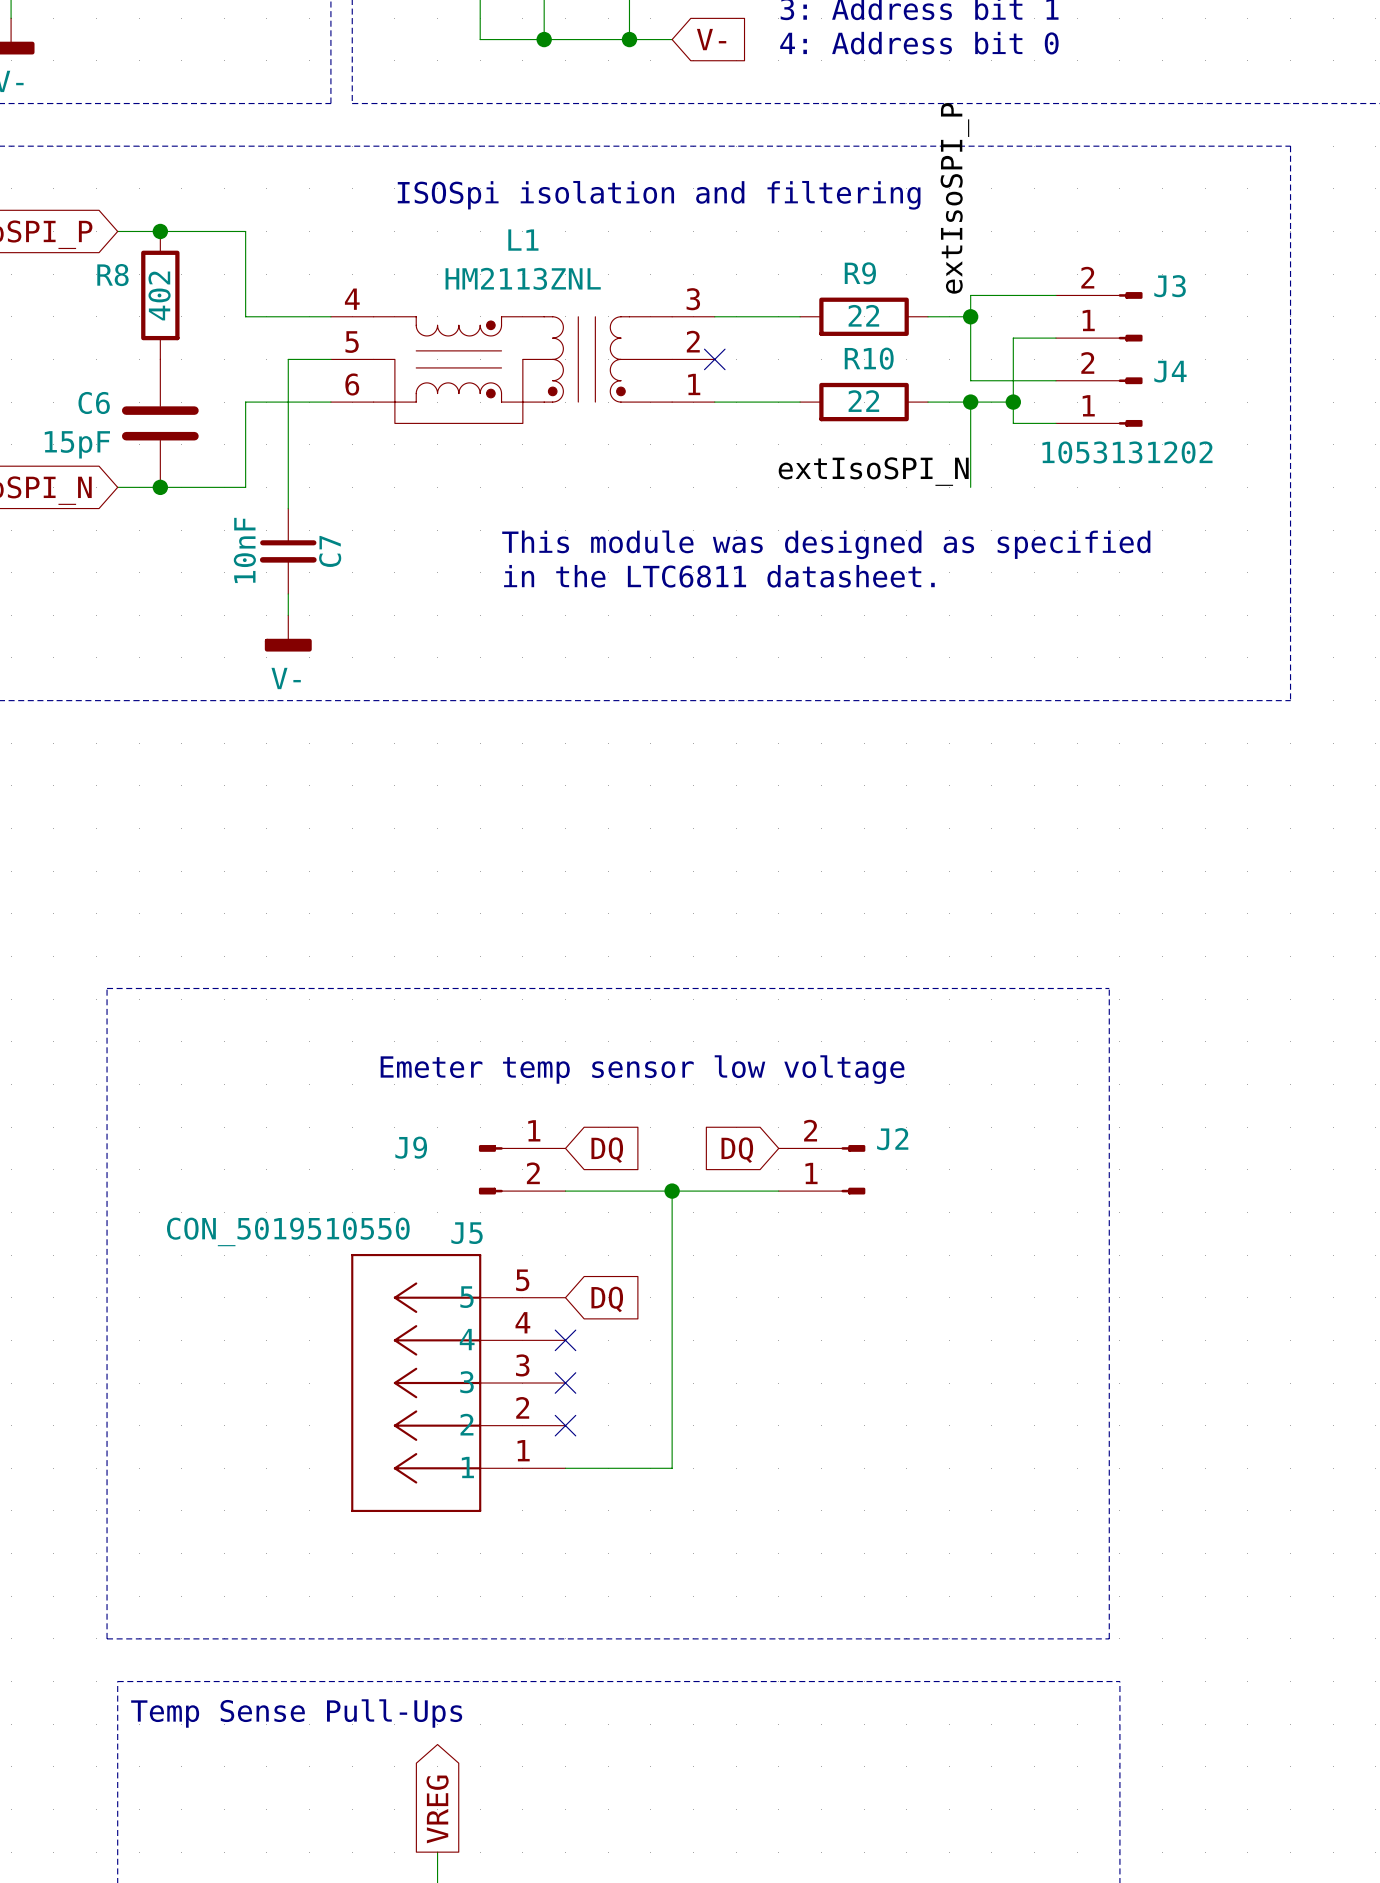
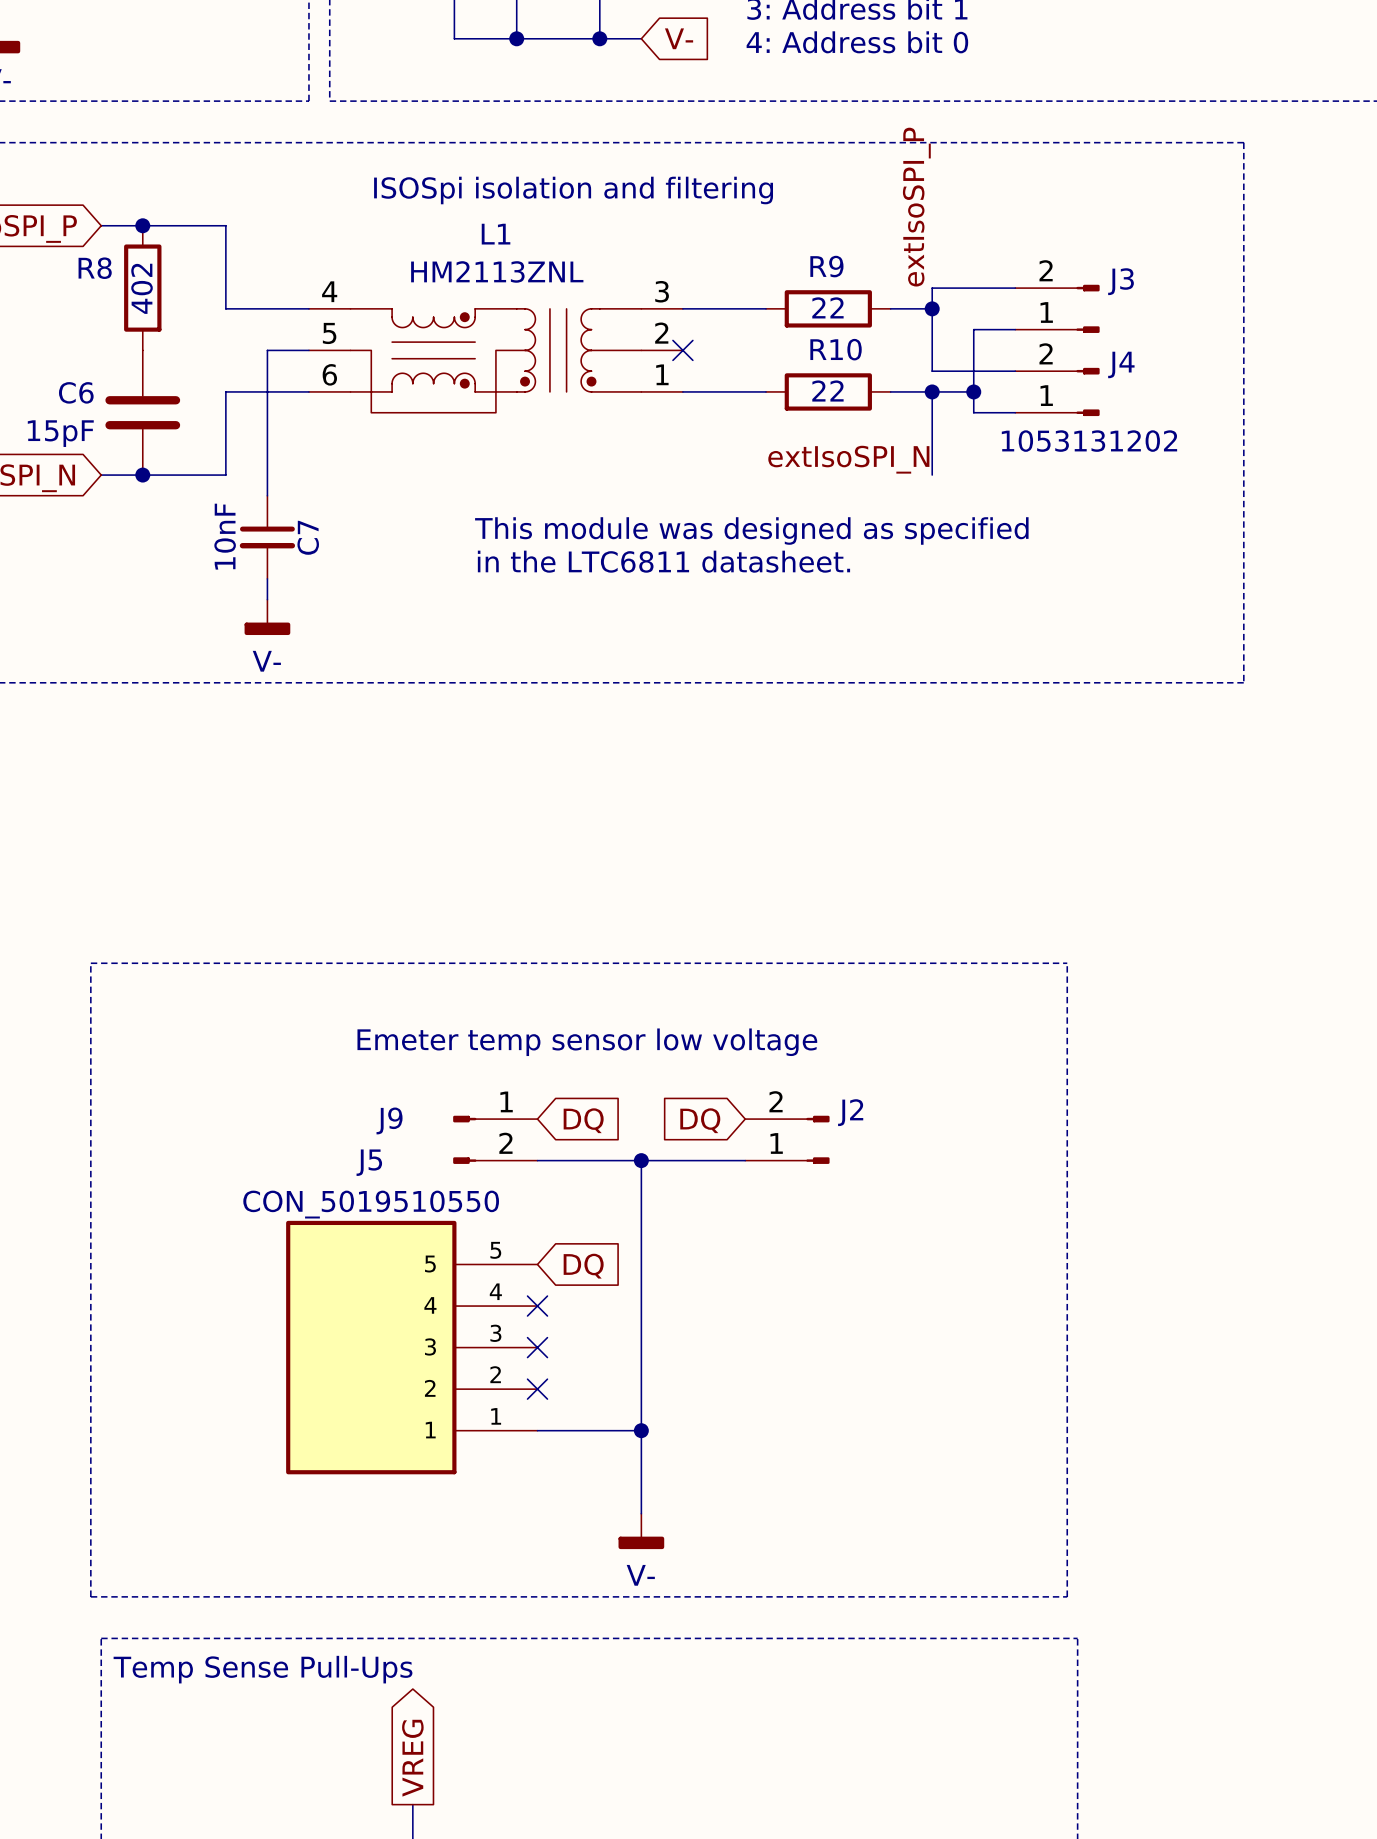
J5 value position: CON_5019510550 (288, 1231) -> CON_5019510550 (371, 1204)
J5 name position: J5 (467, 1233) -> J5 (369, 1162)
J5 symbol: [351, 1253, 566, 1513] -> [286, 1220, 538, 1475]
wire: none -> (641, 1430) (641, 1513)
junction: none -> (641, 1430)
power symbol: none -> V- (641, 1531)

